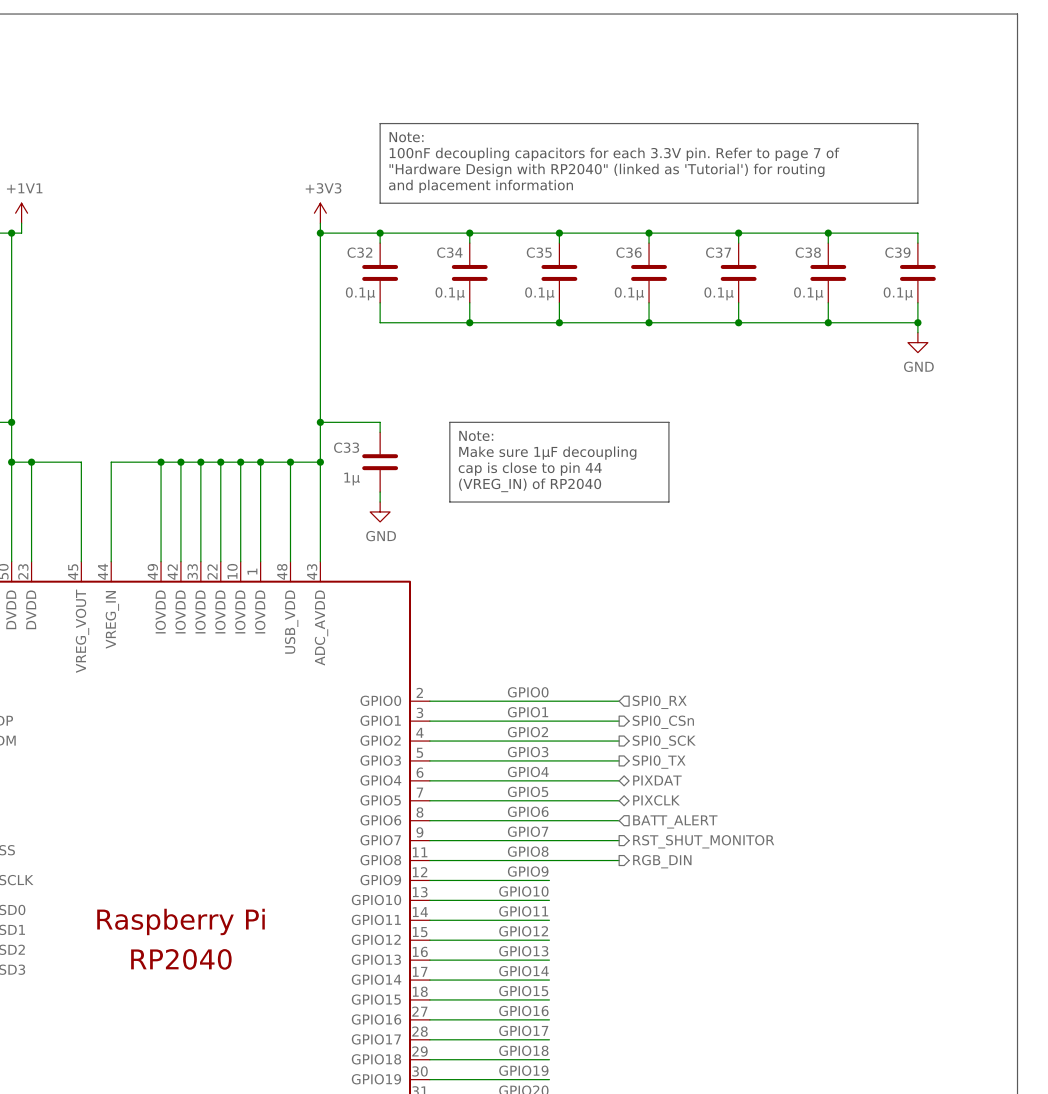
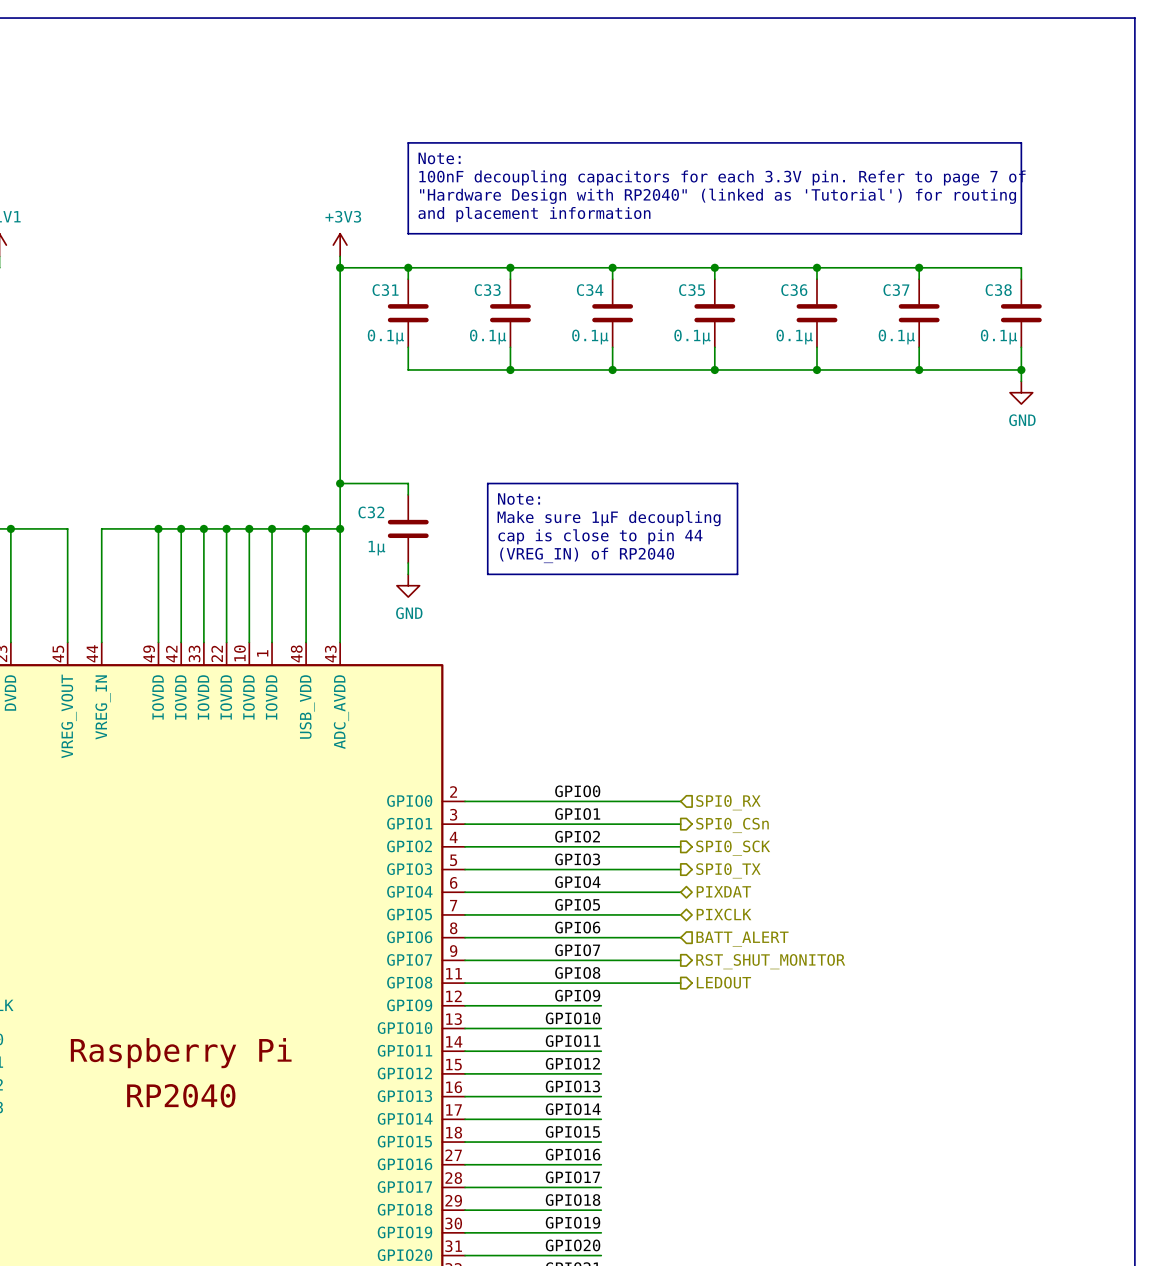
C32 name: C32 (359, 252) -> C31 (385, 290)
C34 name: C34 (449, 252) -> C33 (487, 290)
C35 name: C35 (539, 252) -> C34 (590, 290)
C36 name: C36 (629, 252) -> C35 (692, 290)
C37 name: C37 (718, 252) -> C36 (794, 290)
C38 name: C38 (808, 252) -> C37 (896, 290)
C39 name: C39 (897, 252) -> C38 (998, 290)
C33 name: C33 (346, 447) -> C32 (371, 512)
hierarchical label: RGB_DIN (662, 861) -> LEDOUT (723, 982)

